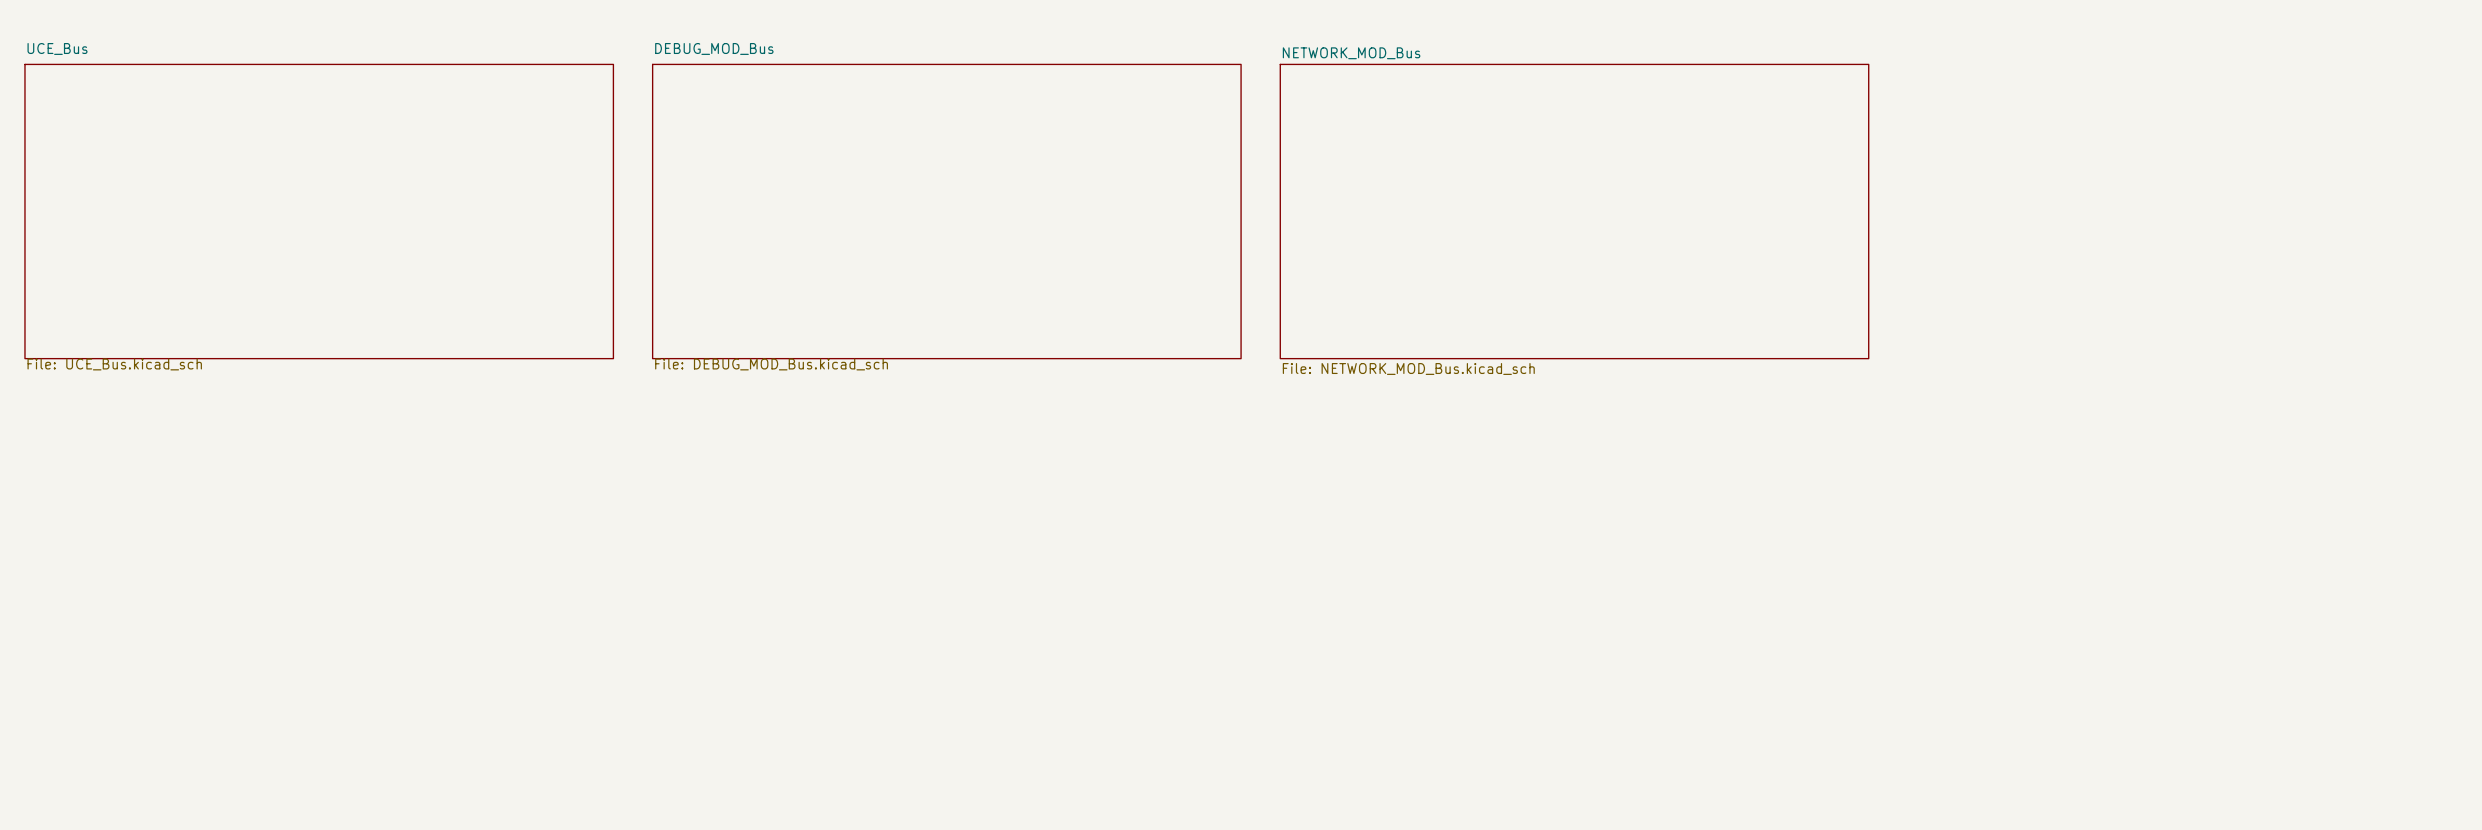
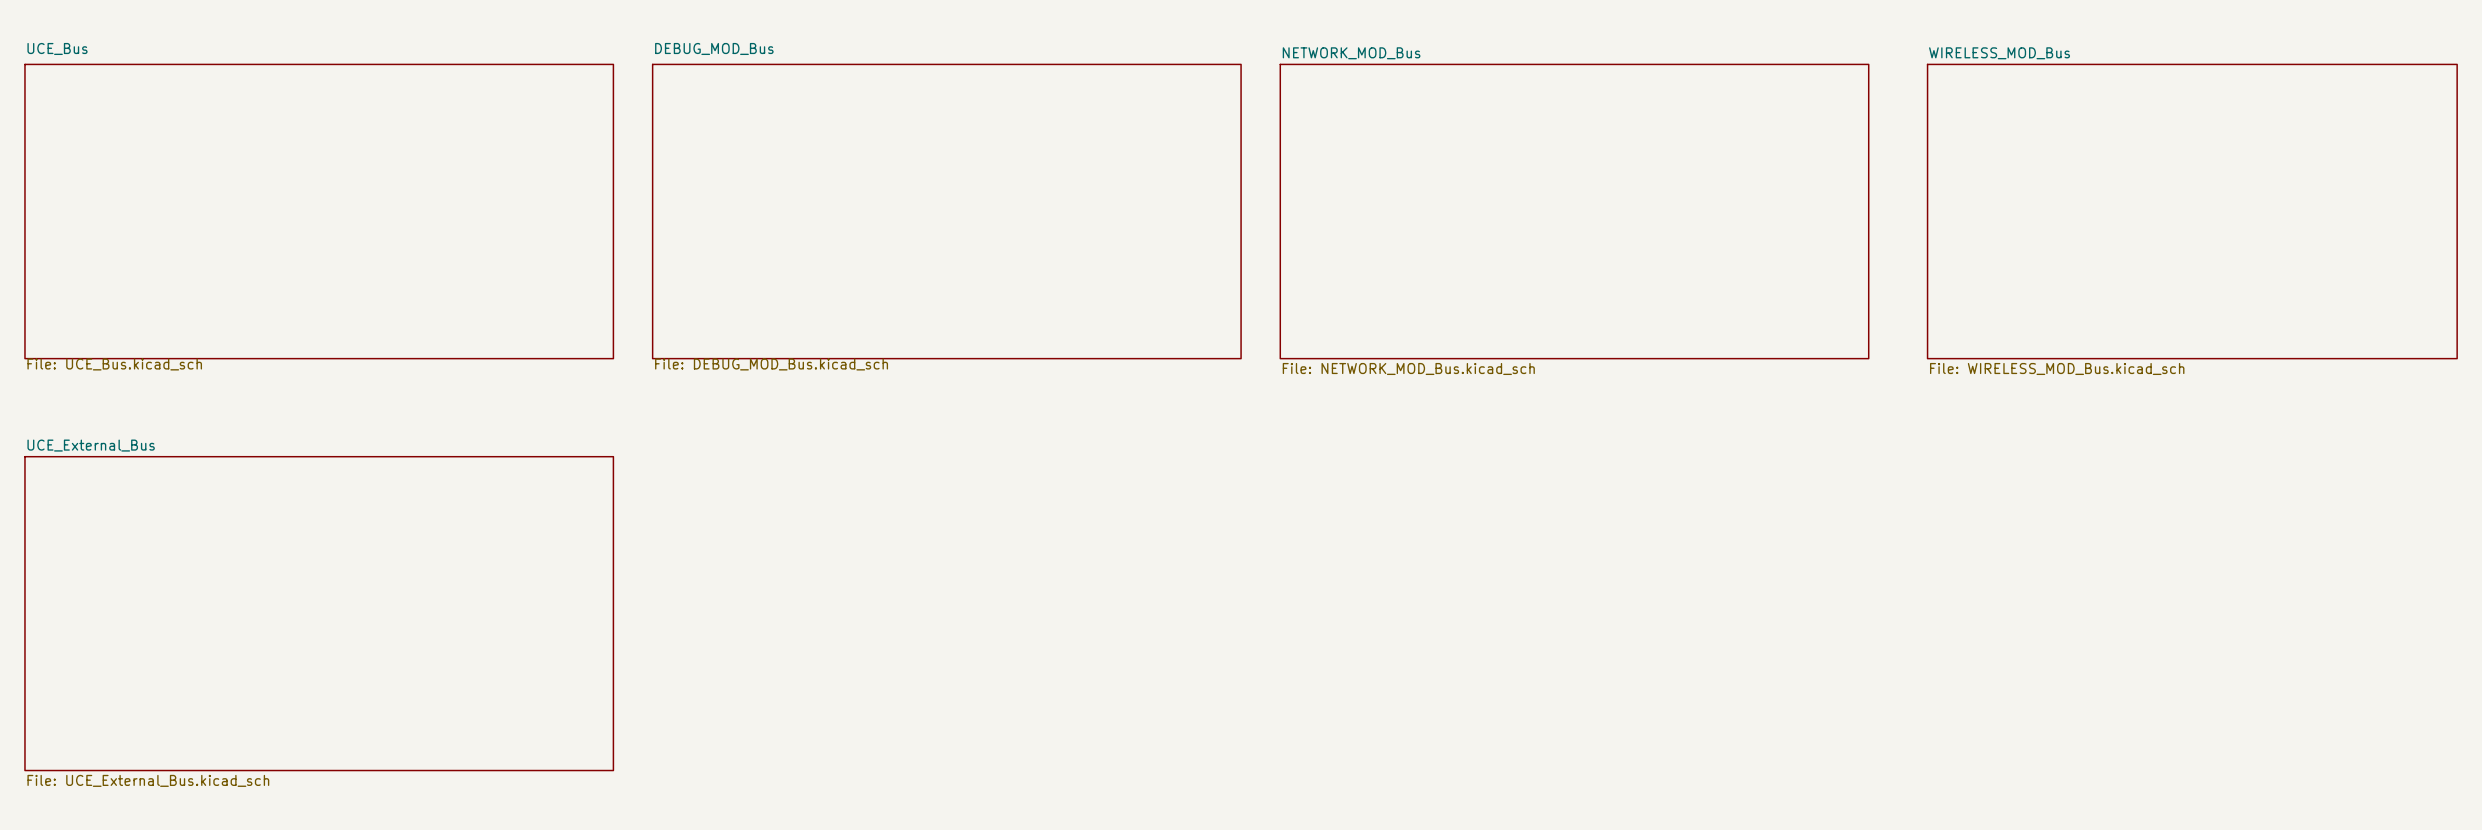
sheet WIRELESS_MOD_Bus: none -> File: WIRELESS_MOD_Bus.kicad_sch (2192, 211)
sheet UCE_External_Bus: none -> File: UCE_External_Bus.kicad_sch (319, 613)

